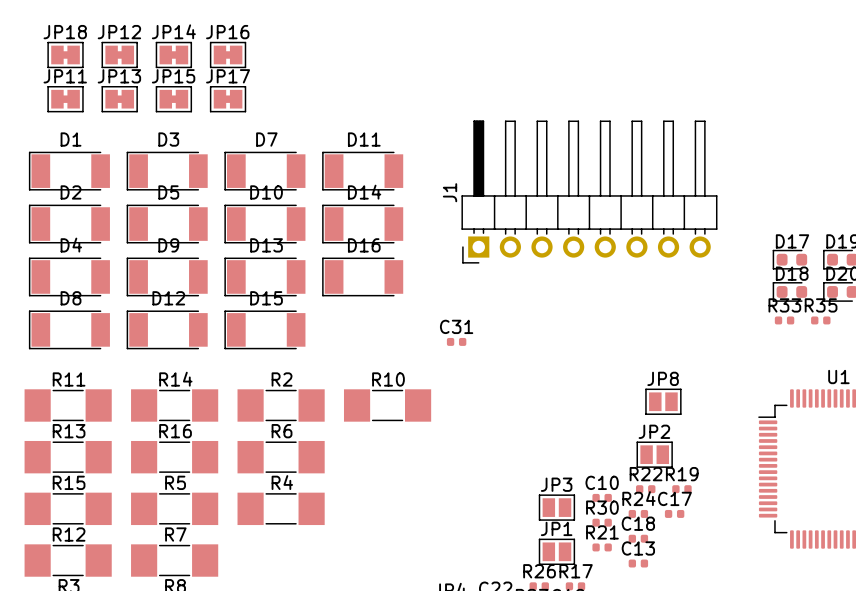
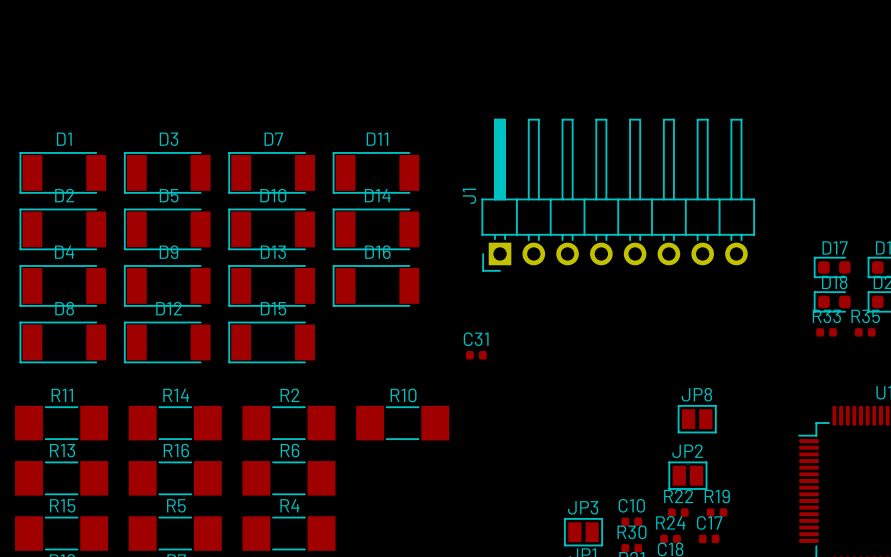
JP18: (65, 54) -> none
JP12: (119, 54) -> none
JP14: (173, 54) -> none
JP16: (228, 54) -> none
JP11: (65, 99) -> none
JP13: (119, 99) -> none
JP15: (173, 99) -> none
JP17: (228, 99) -> none

